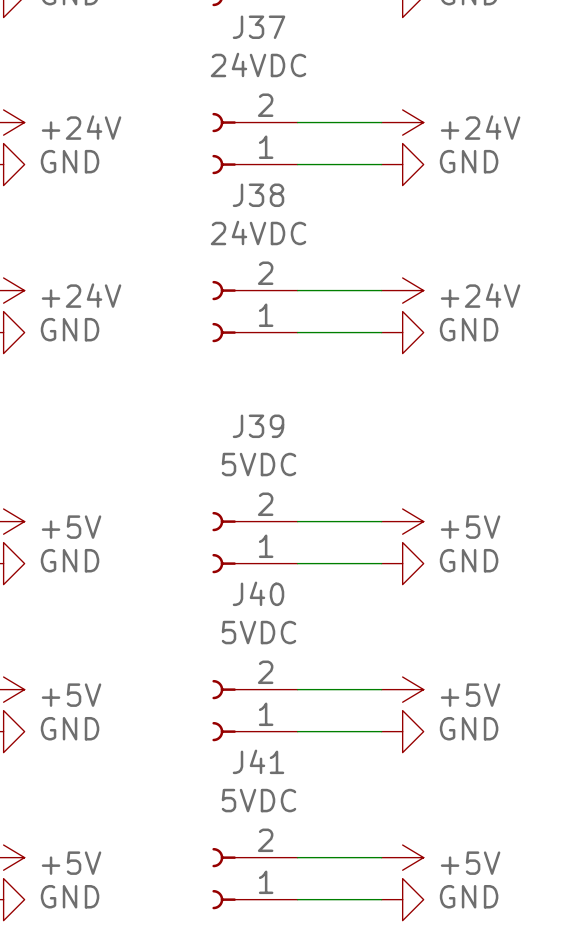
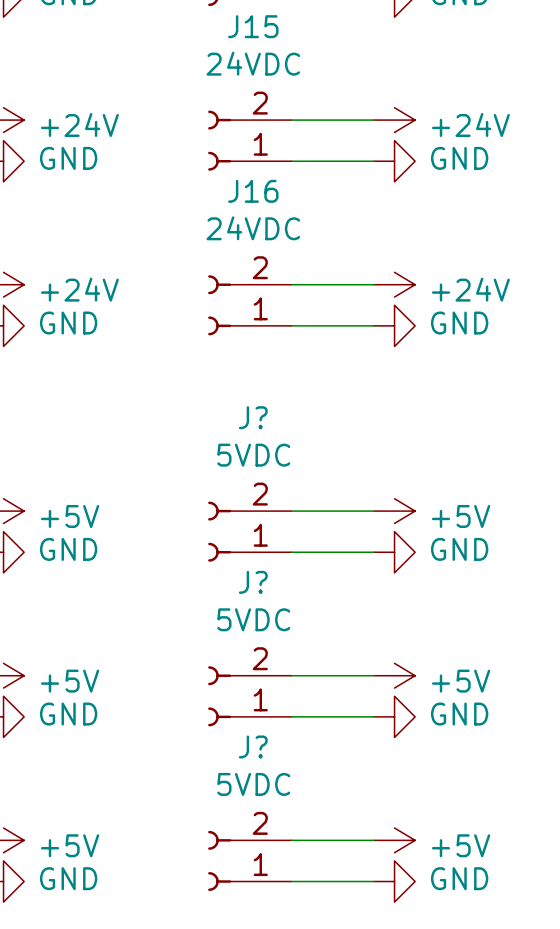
J37 name: J37 (259, 27) -> J15 (253, 26)
J38 name: J38 (258, 195) -> J16 (253, 191)
J39 name: J39 (258, 426) -> J? (253, 417)
J40 name: J40 (258, 593) -> J? (253, 582)
J41 name: J41 (258, 761) -> J? (253, 746)

